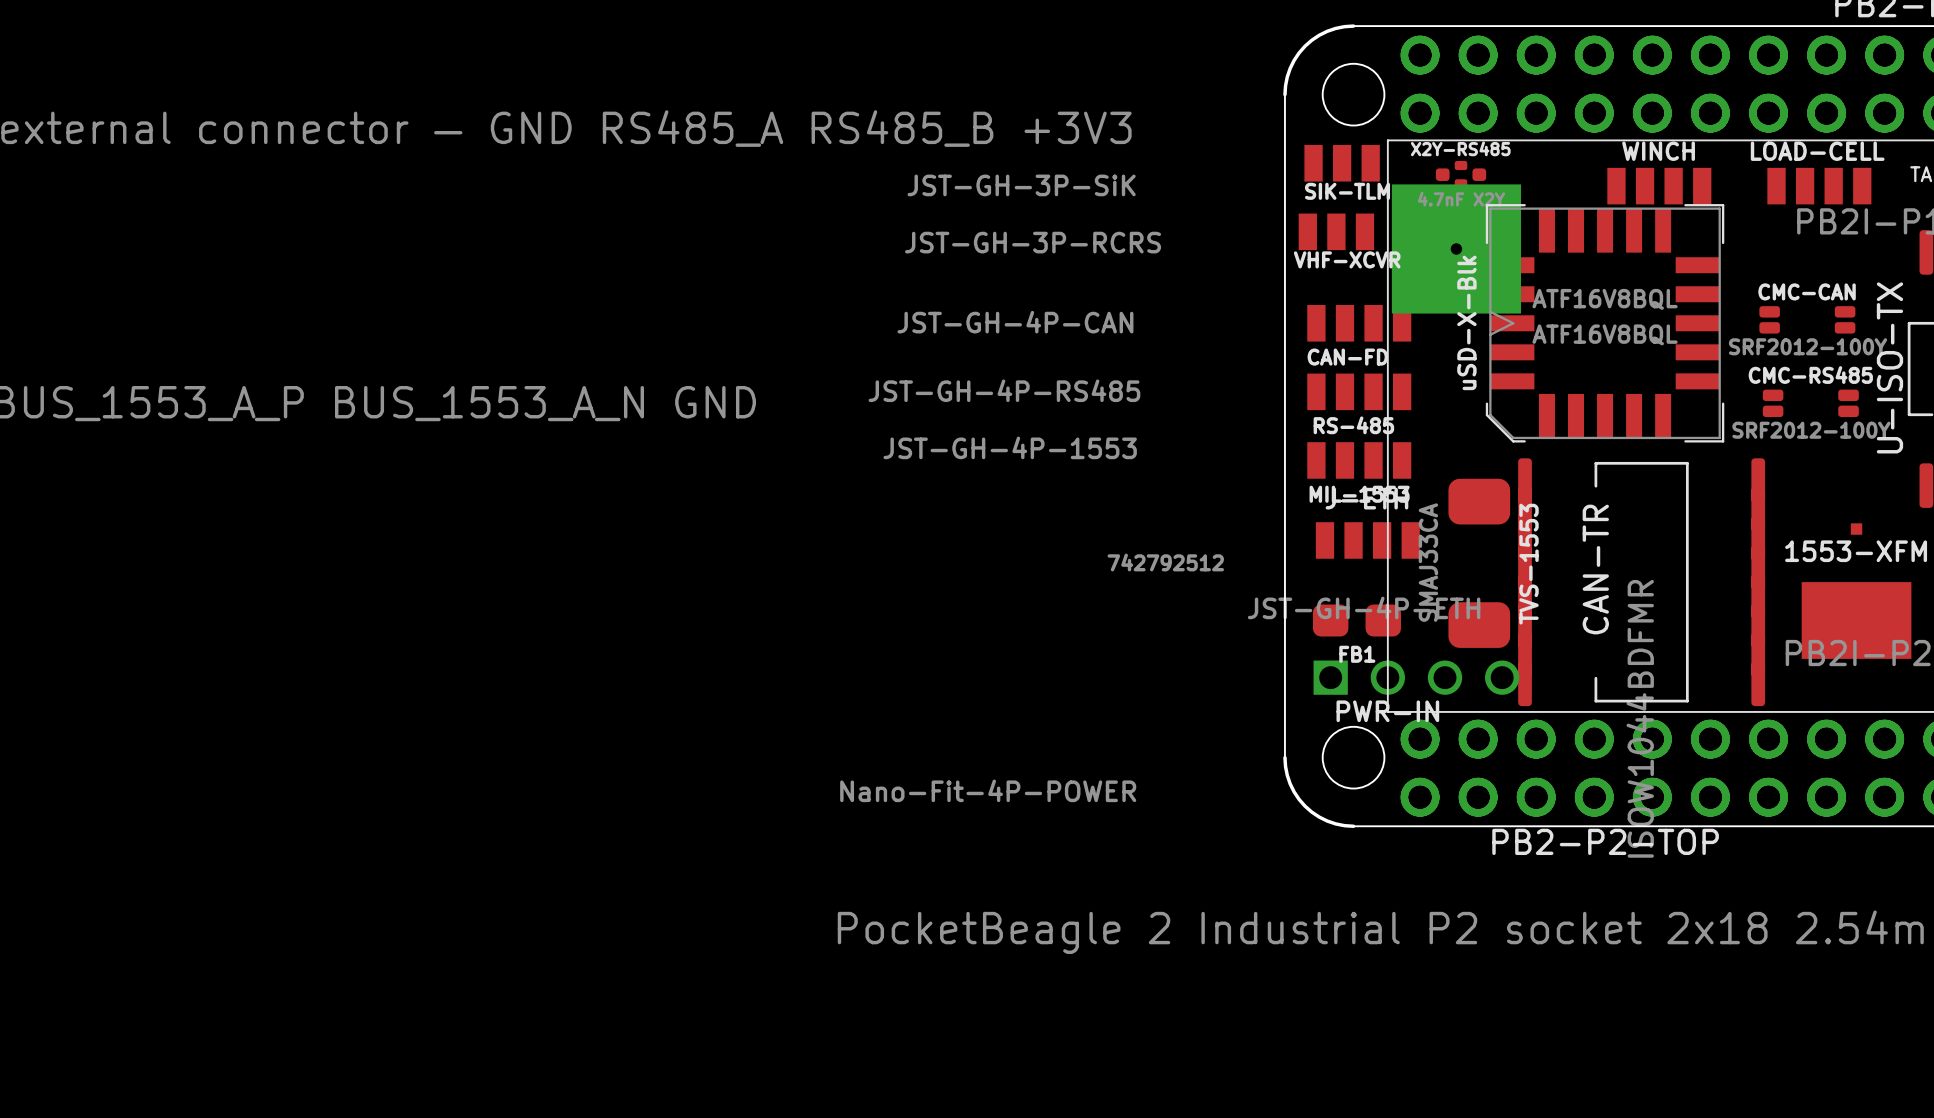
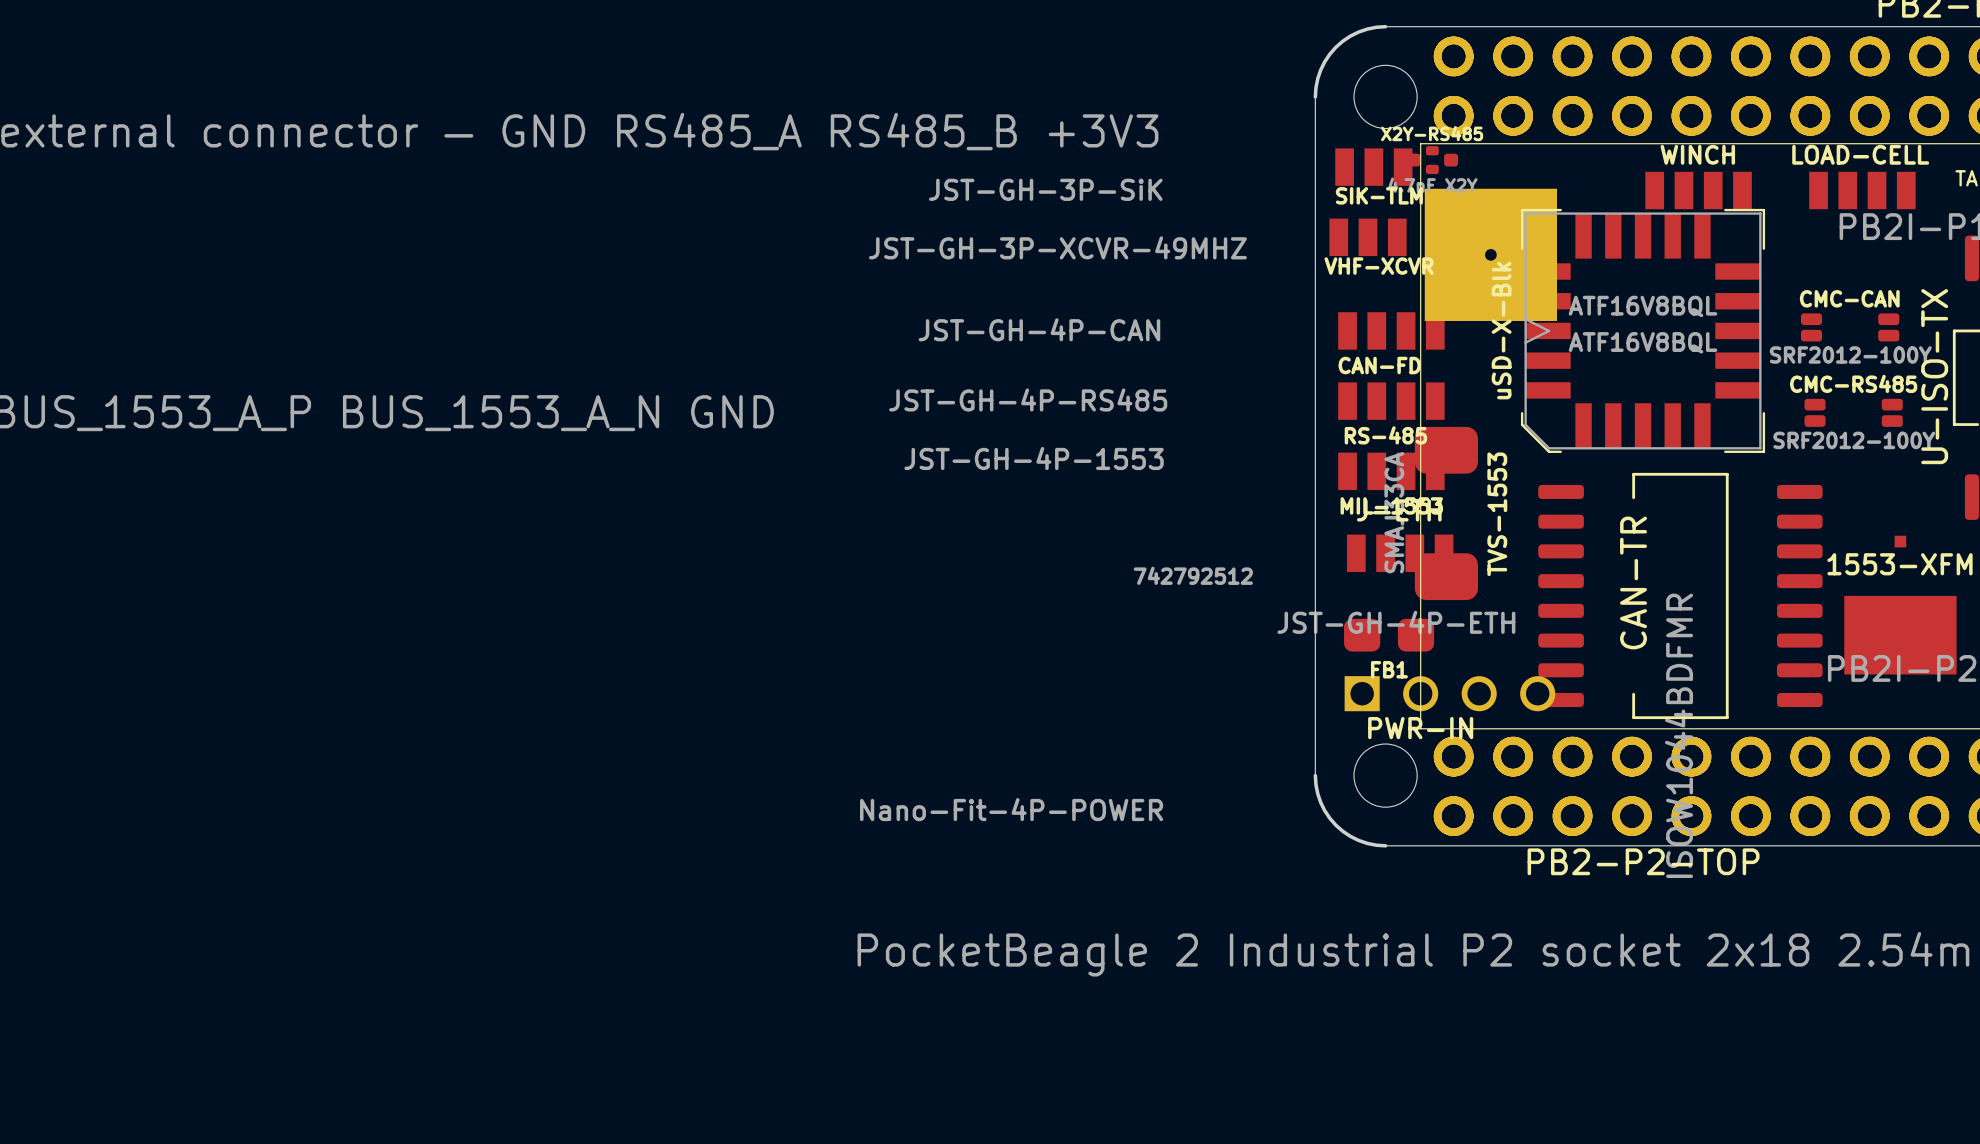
X2Y-RS485 position: (1461, 174) -> (1432, 160)
VHF-XCVR value: JST-GH-3P-RCRS (1033, 242) -> JST-GH-3P-XCVR-49MHZ (1057, 247)
CAN-TR footprint: [1518, 458, 1766, 707] -> [1538, 472, 1823, 720]
TVS-1553 position: (1479, 563) -> (1446, 513)

